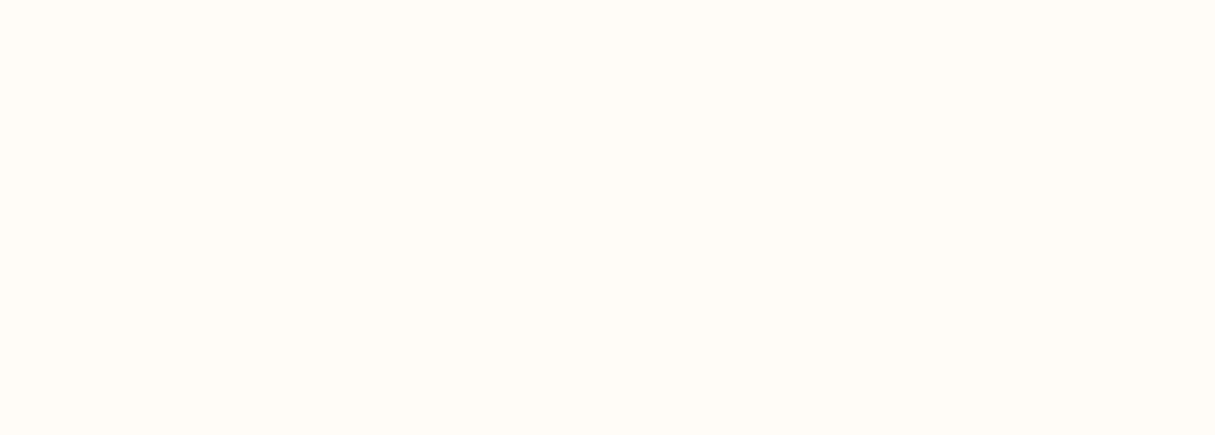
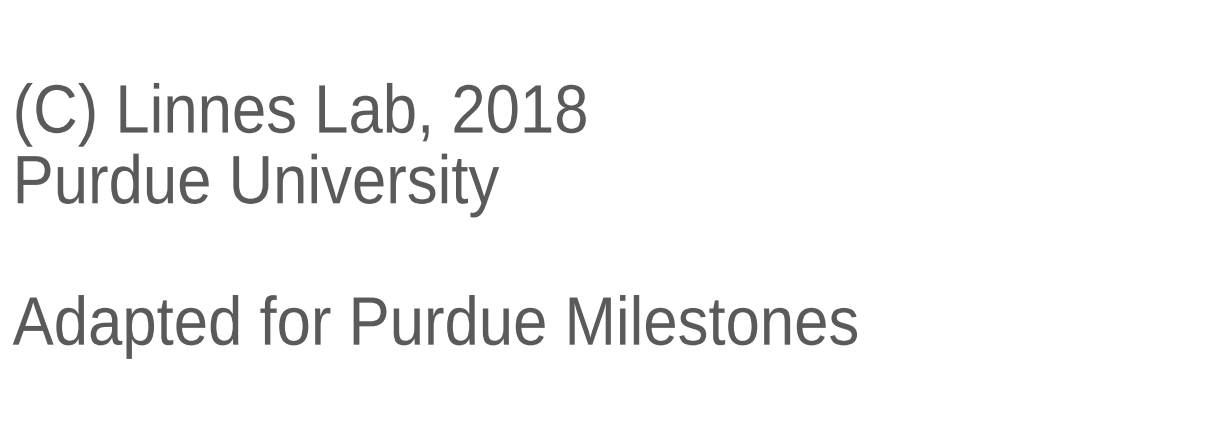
text: none -> (C) Linnes Lab, 2018 (301, 114)
text: none -> Purdue University (258, 185)
text: none -> Adapted for Purdue Milestones (434, 326)

